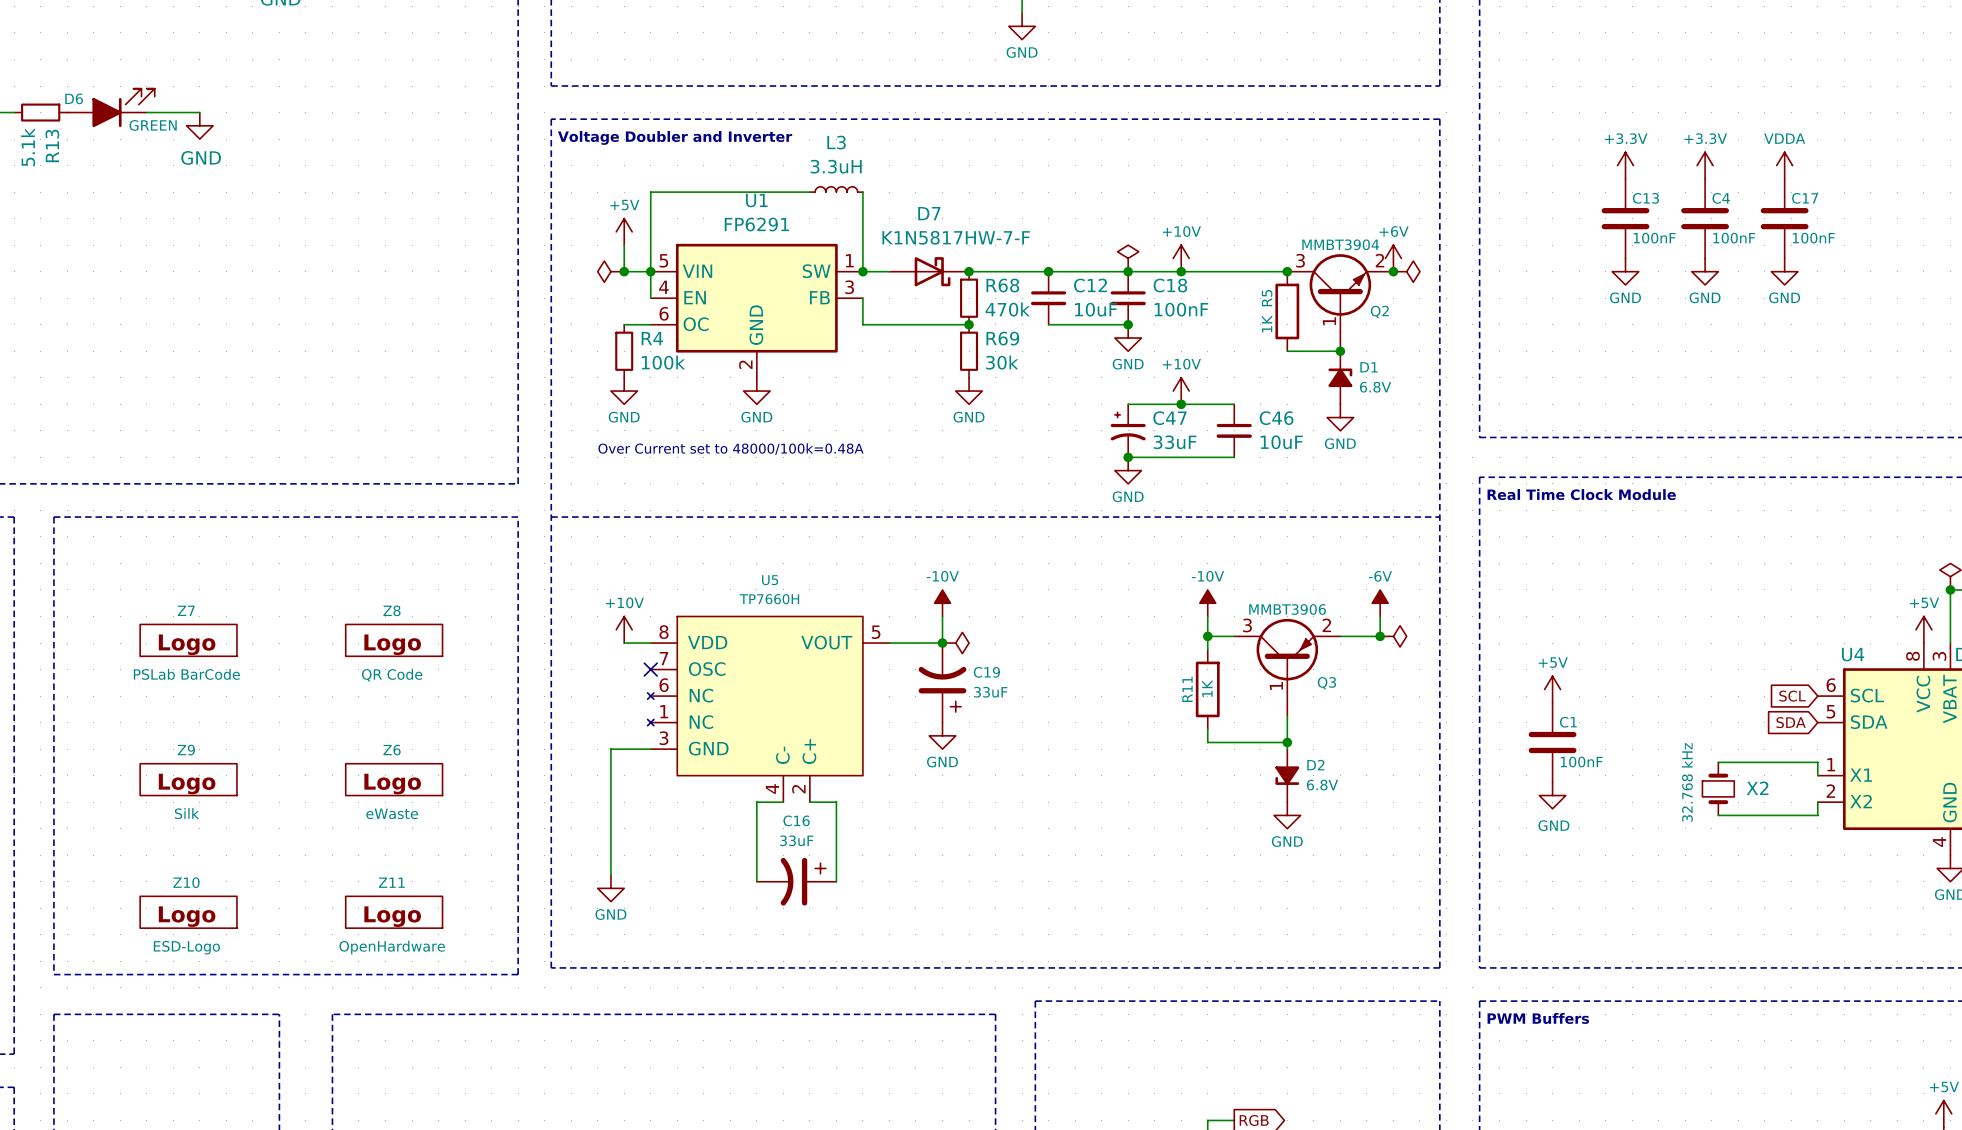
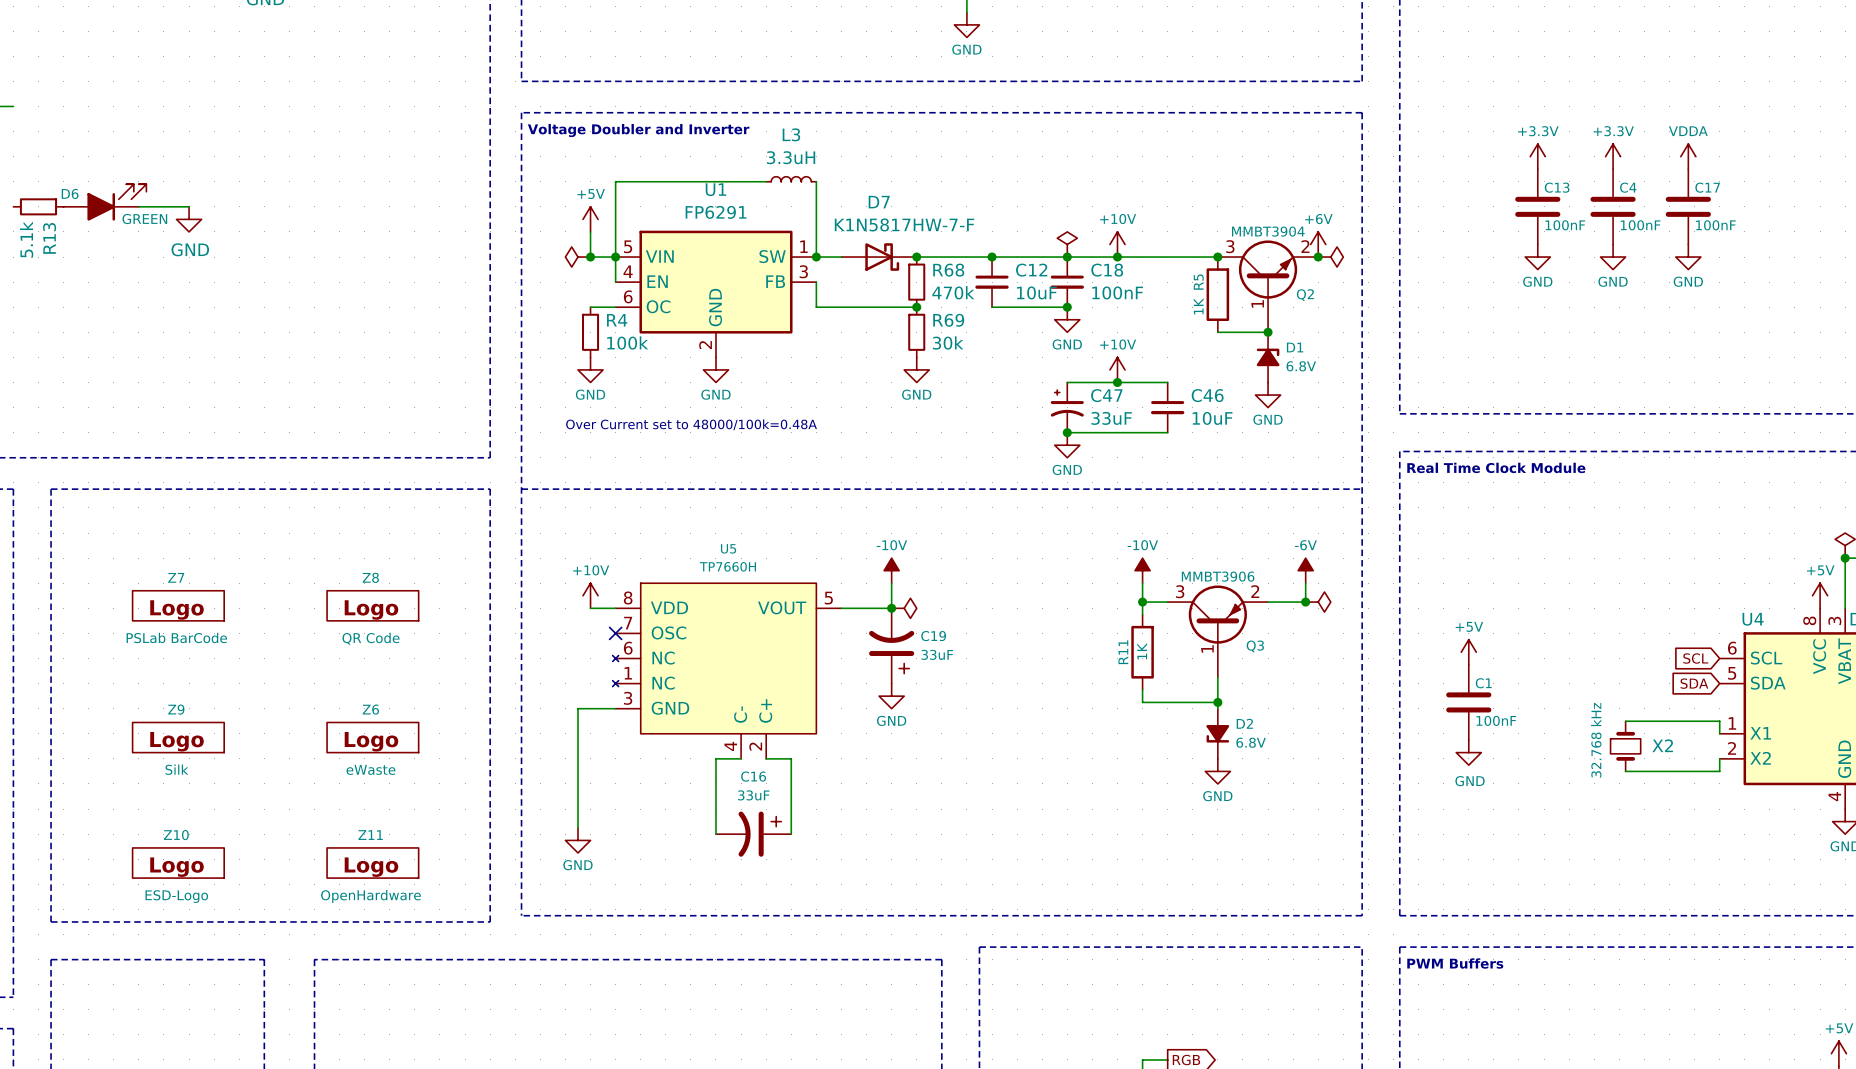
D6 position: (110, 107) -> (104, 202)
R13 position: (40, 112) -> (38, 206)
wire: (146, 112) (199, 112) -> (138, 206) (189, 206)
power symbol position: GND (199, 125) -> GND (189, 219)

